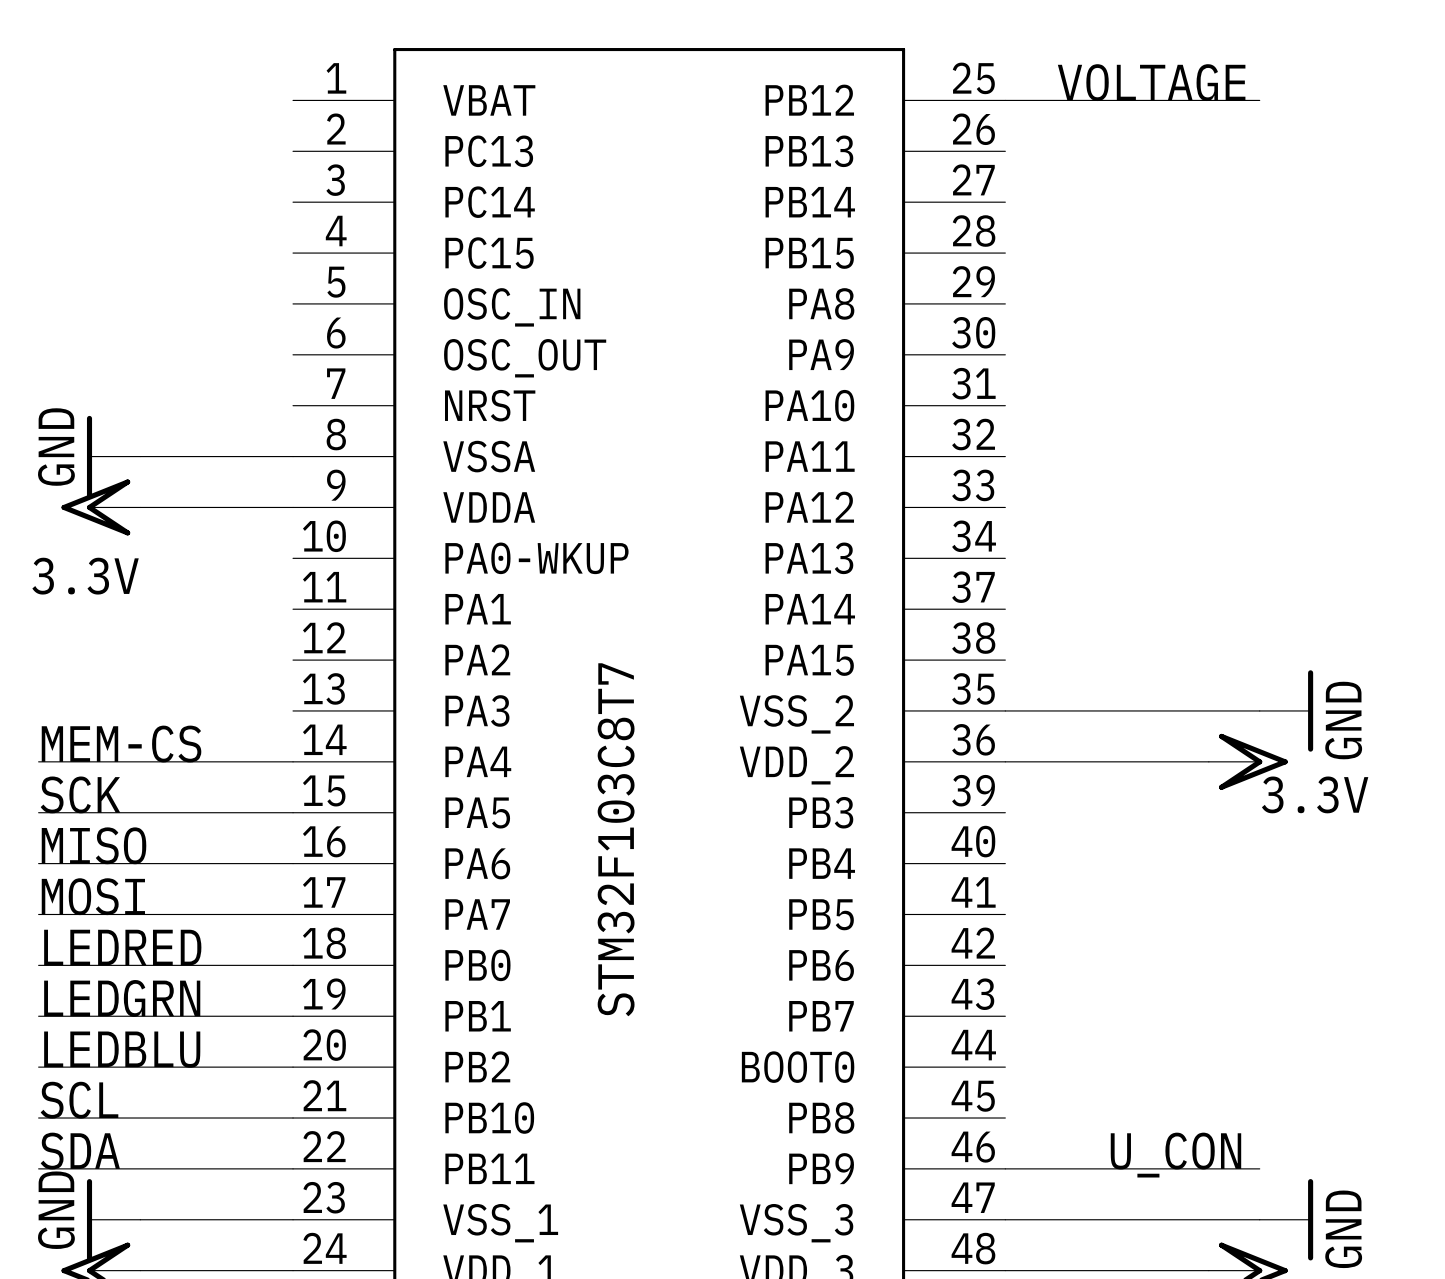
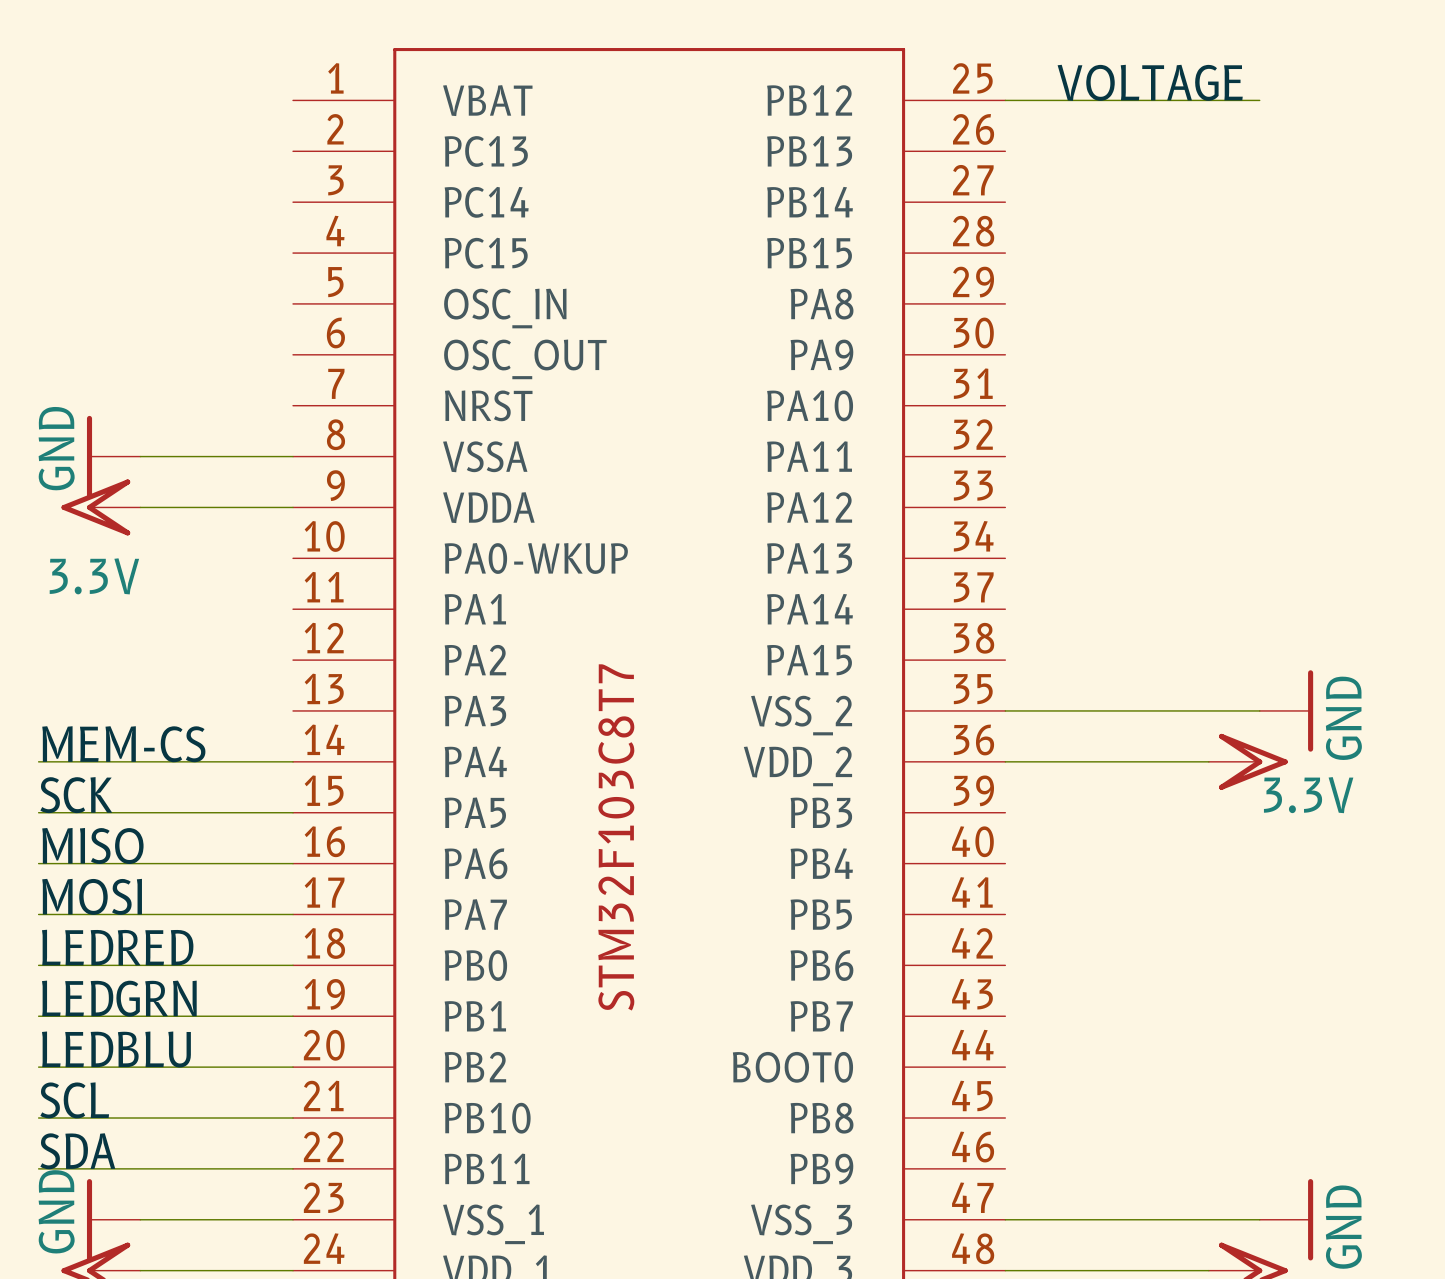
label: U_CON (1175, 1155) -> none
wire: (1005, 1168) (1259, 1168) -> none

